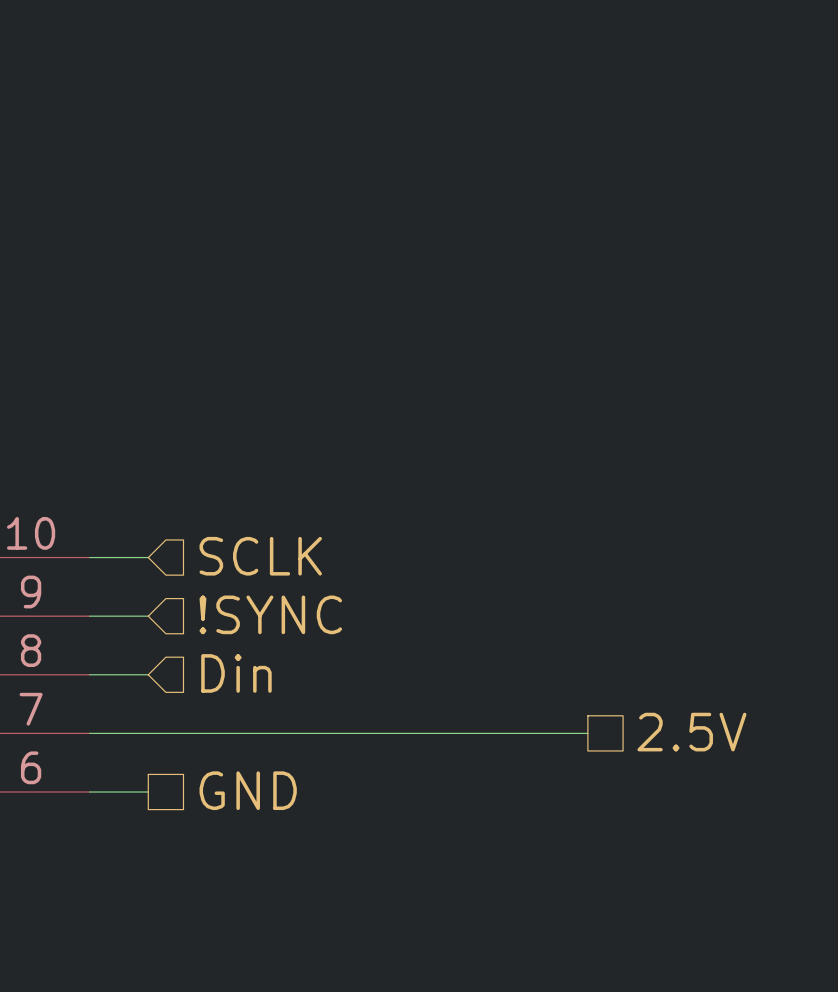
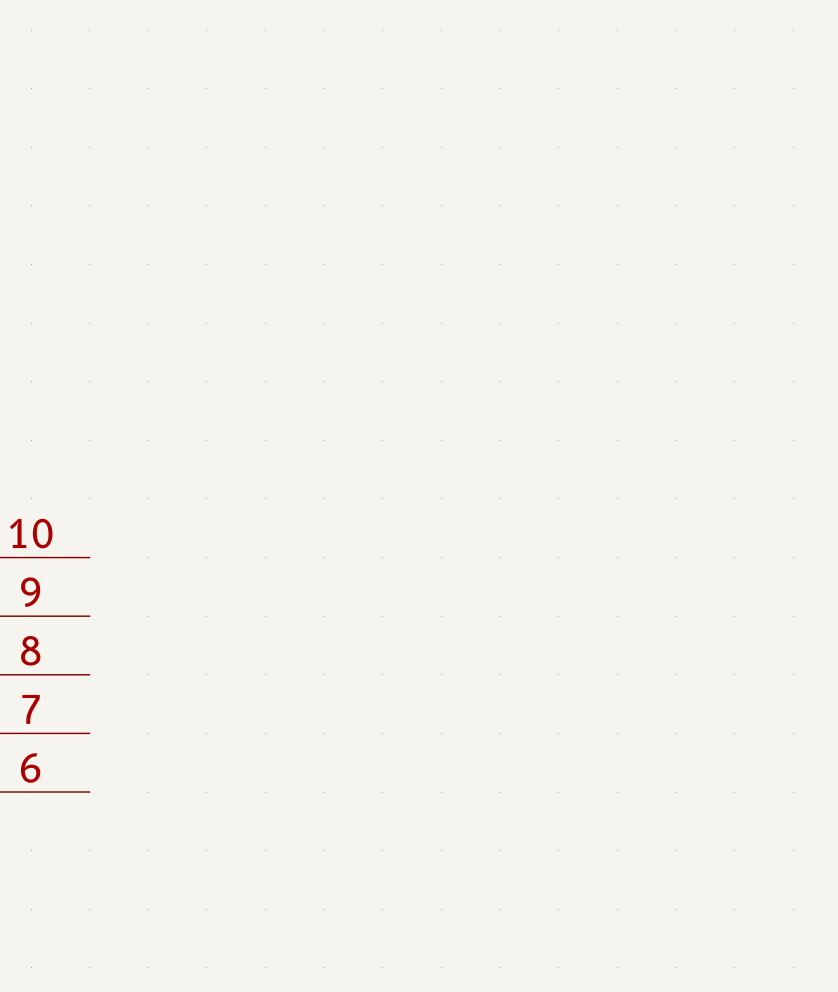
hierarchical label: SCLK (260, 556) -> none
wire: (89, 557) (148, 557) -> none
hierarchical label: !SYNC (270, 614) -> none
wire: (89, 616) (148, 616) -> none
hierarchical label: Din (236, 673) -> none
wire: (89, 674) (148, 674) -> none
hierarchical label: 2.5V (691, 732) -> none
wire: (89, 733) (587, 733) -> none
hierarchical label: GND (248, 790) -> none
wire: (89, 792) (148, 792) -> none

